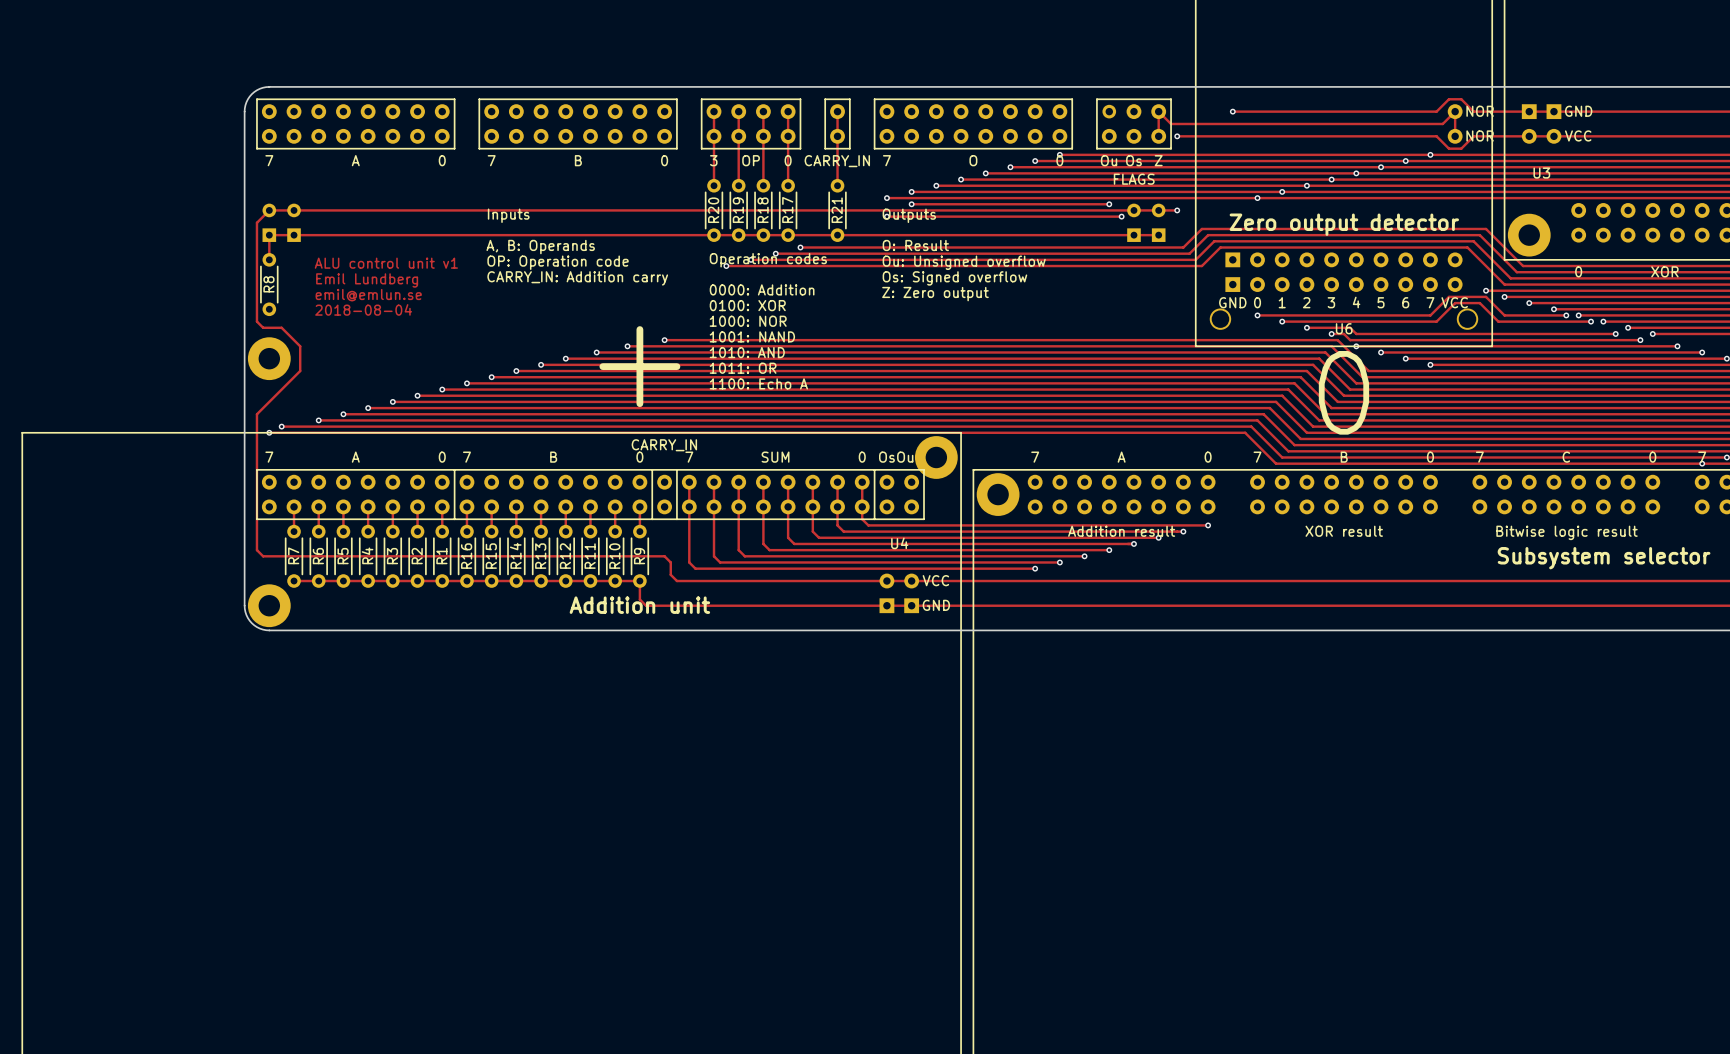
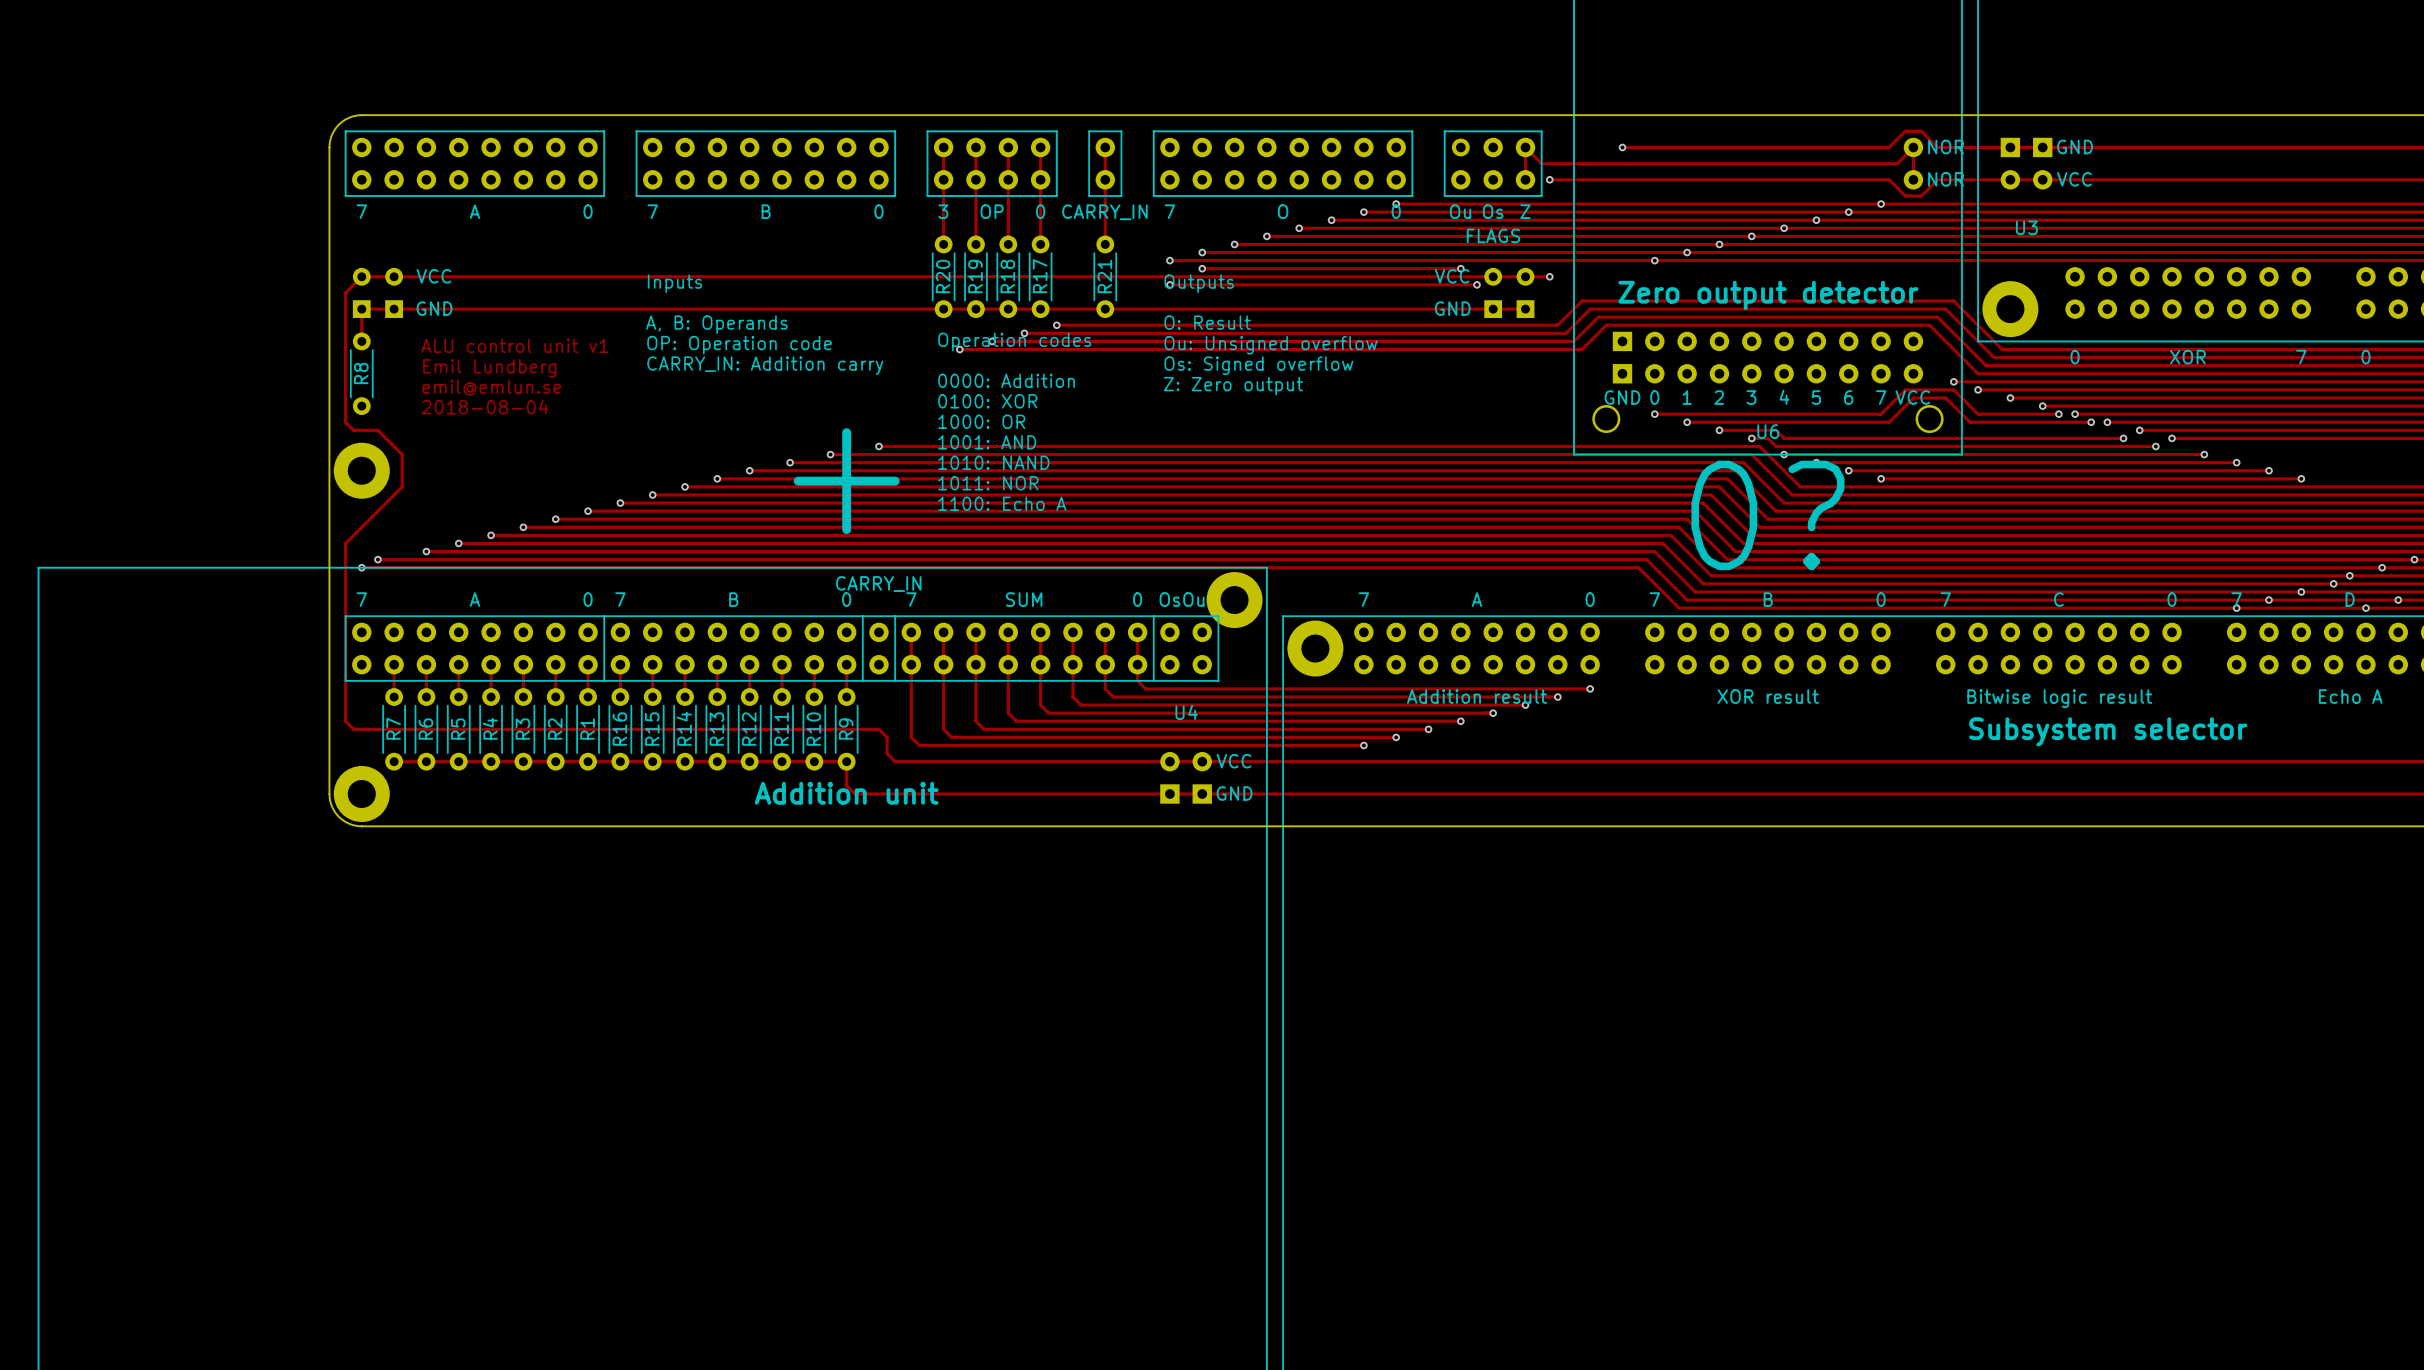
text: none -> VCC (433, 276)
text: none -> VCC (1452, 276)
text: none -> GND (434, 308)
text: none -> GND (1452, 308)
text: 1000: NOR (748, 321) -> 1000: OR (981, 421)
text: 1001: NAND (752, 336) -> 1001: AND (987, 442)
text: 1010: AND (747, 352) -> 1010: NAND (993, 462)
text: 1011: OR (743, 368) -> 1011: NOR (988, 483)
text: 0 (1343, 392) -> 0? (1767, 515)

